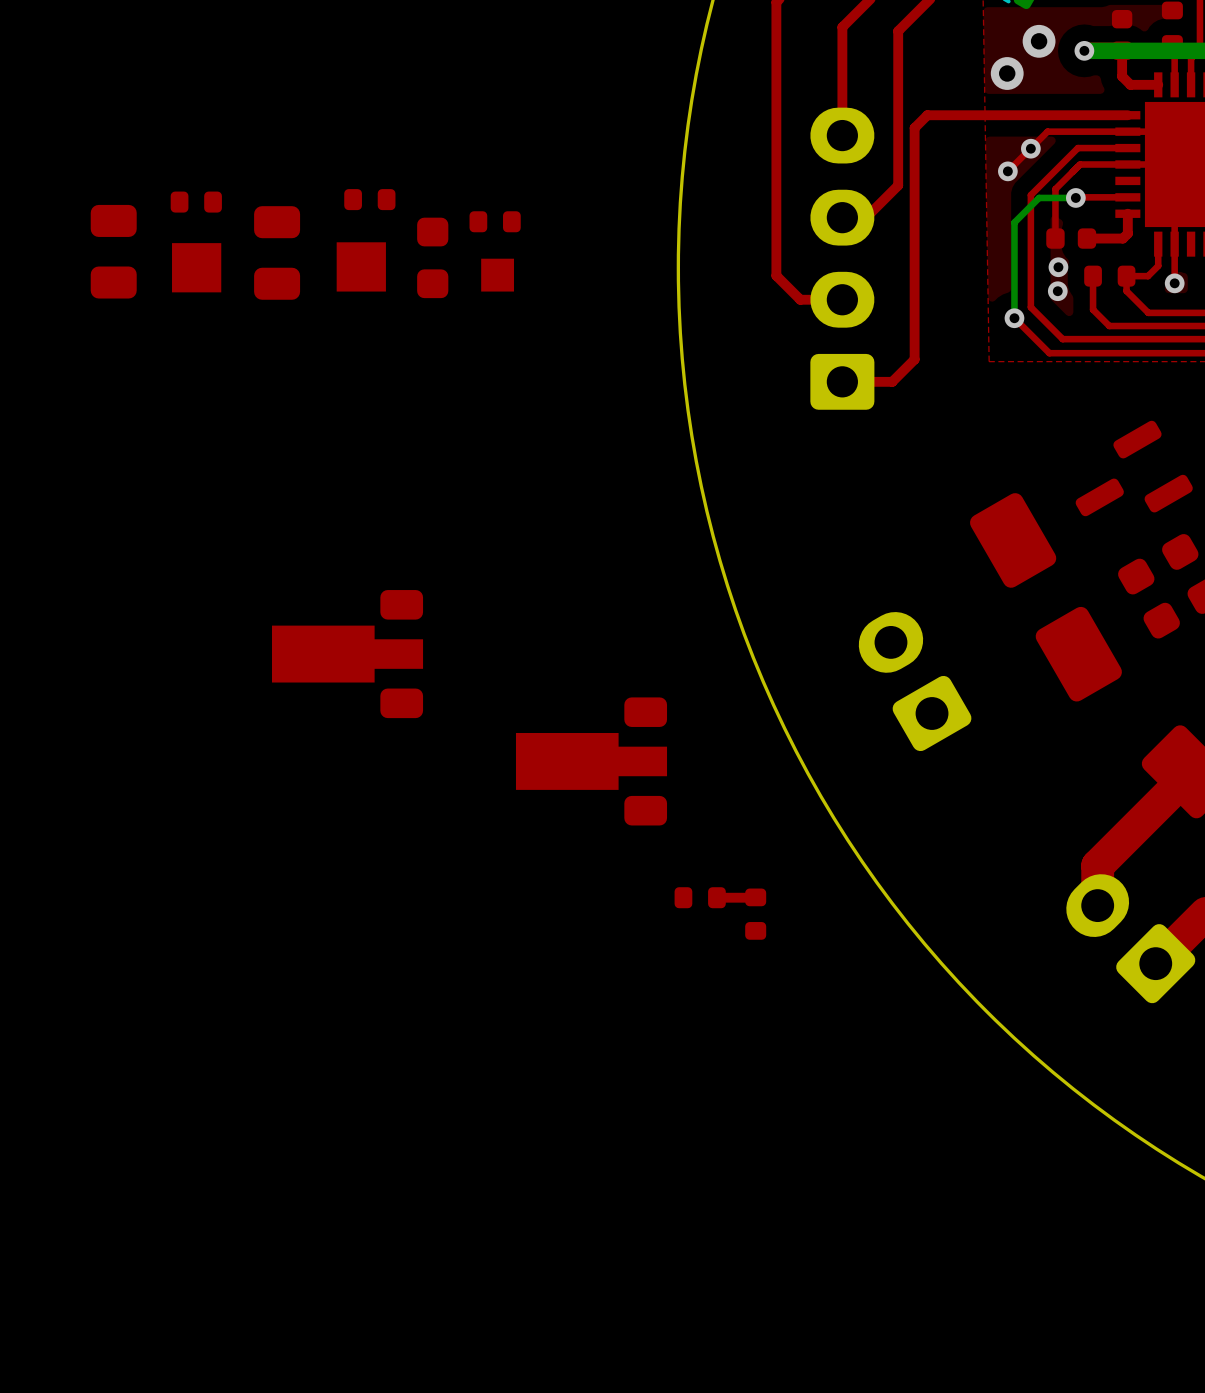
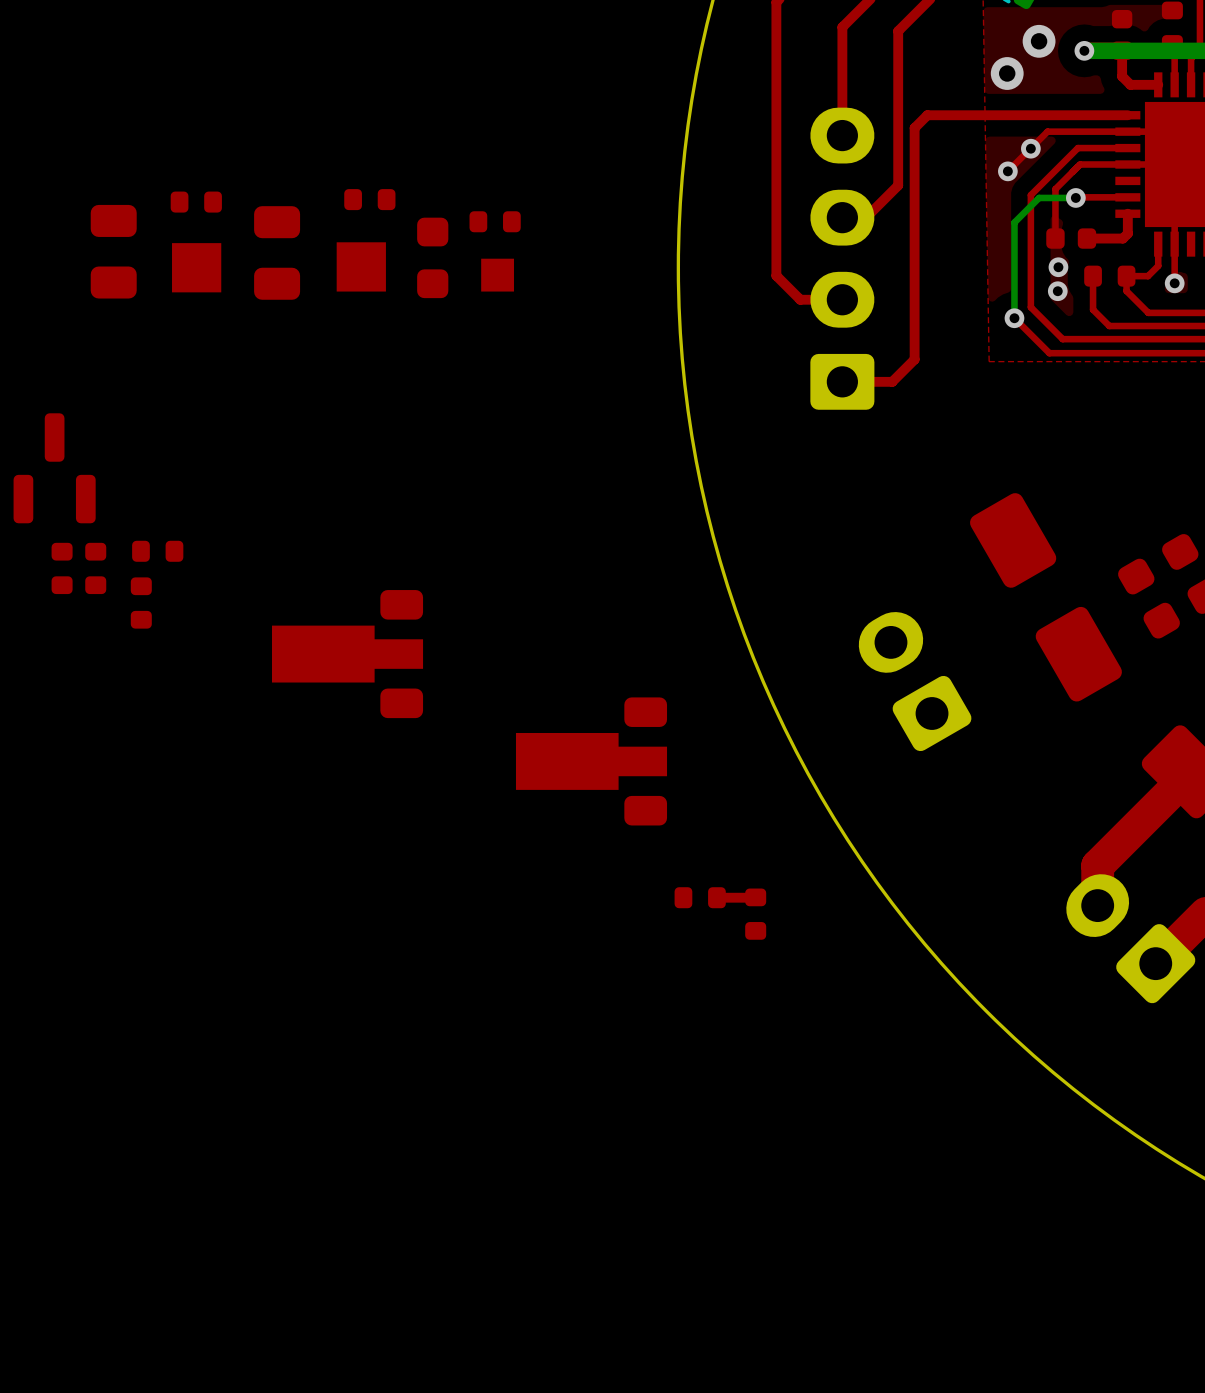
part: none -> (54, 468)
part: (1134, 468) -> none
part: none -> (157, 551)
part: none -> (62, 568)
part: none -> (95, 568)
part: none -> (141, 603)

